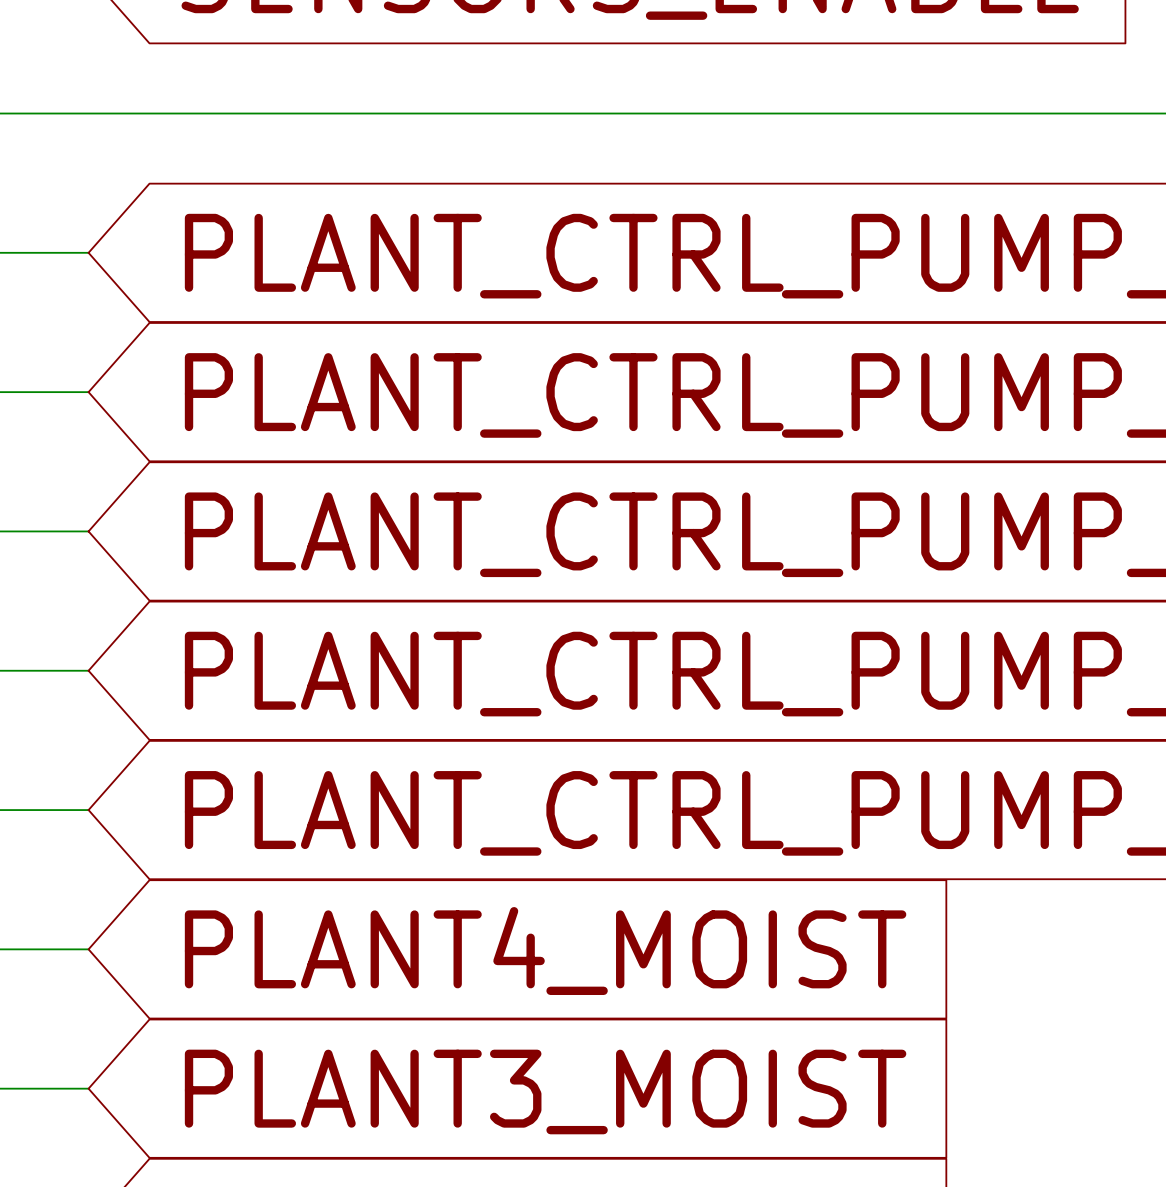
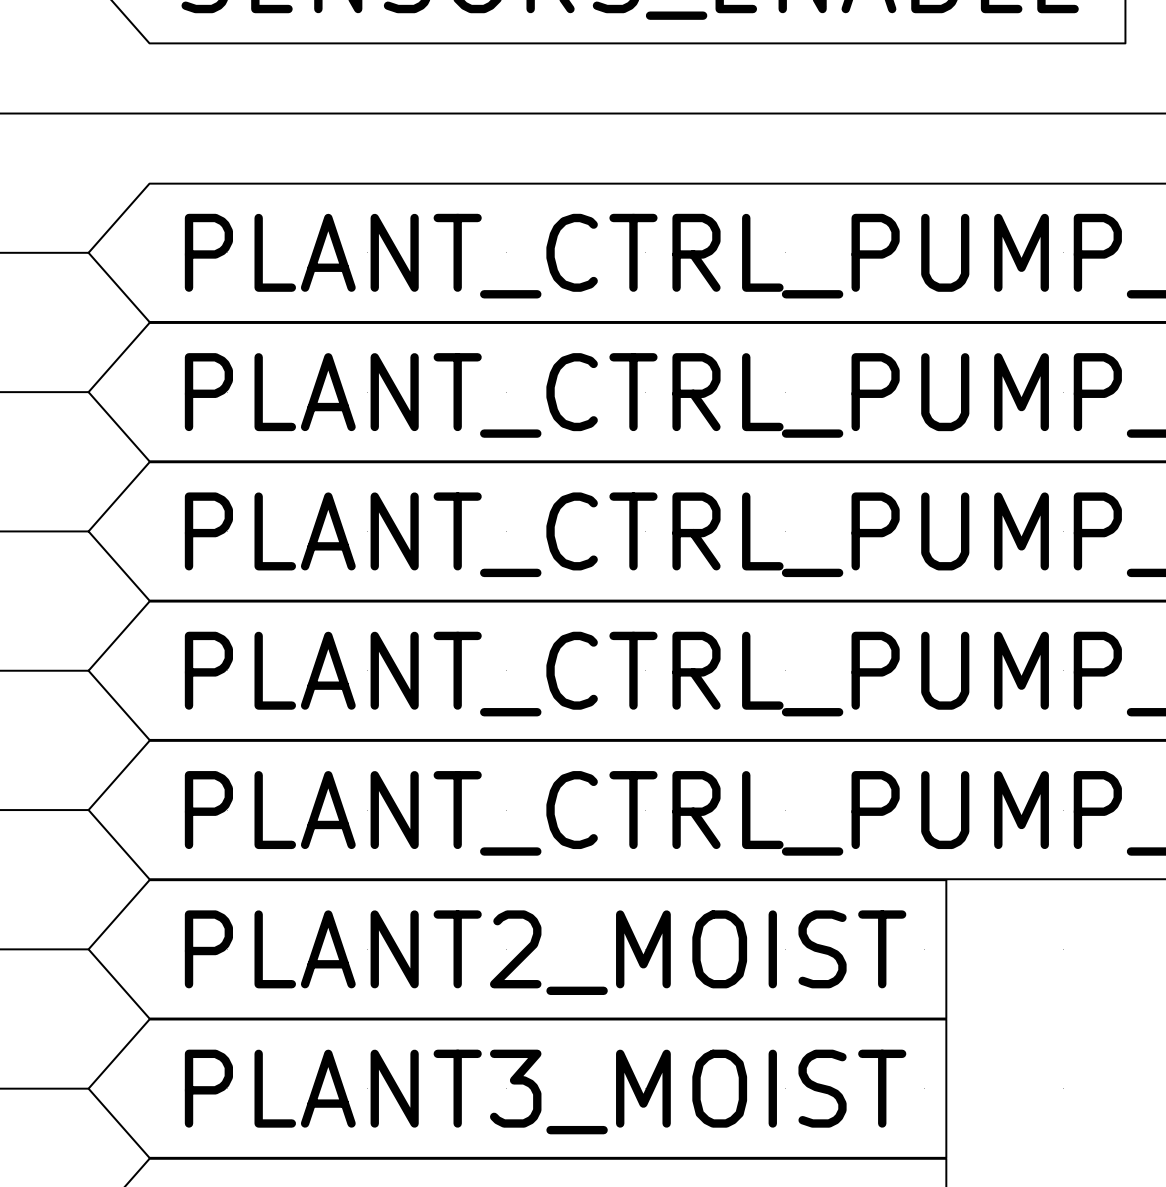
global label: PLANT4_MOIST (545, 951) -> PLANT2_MOIST (545, 952)

